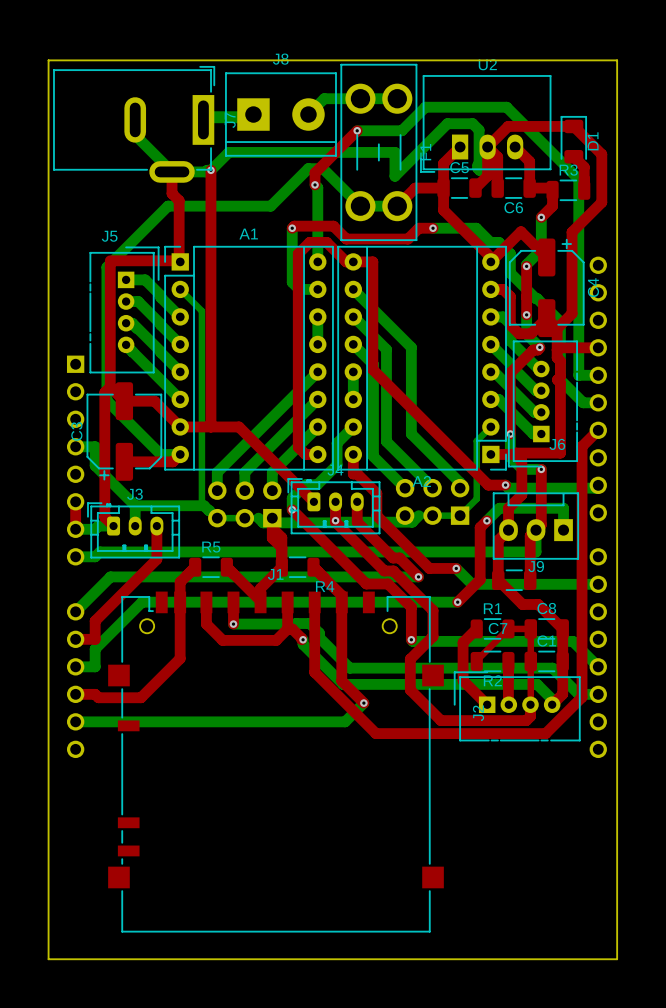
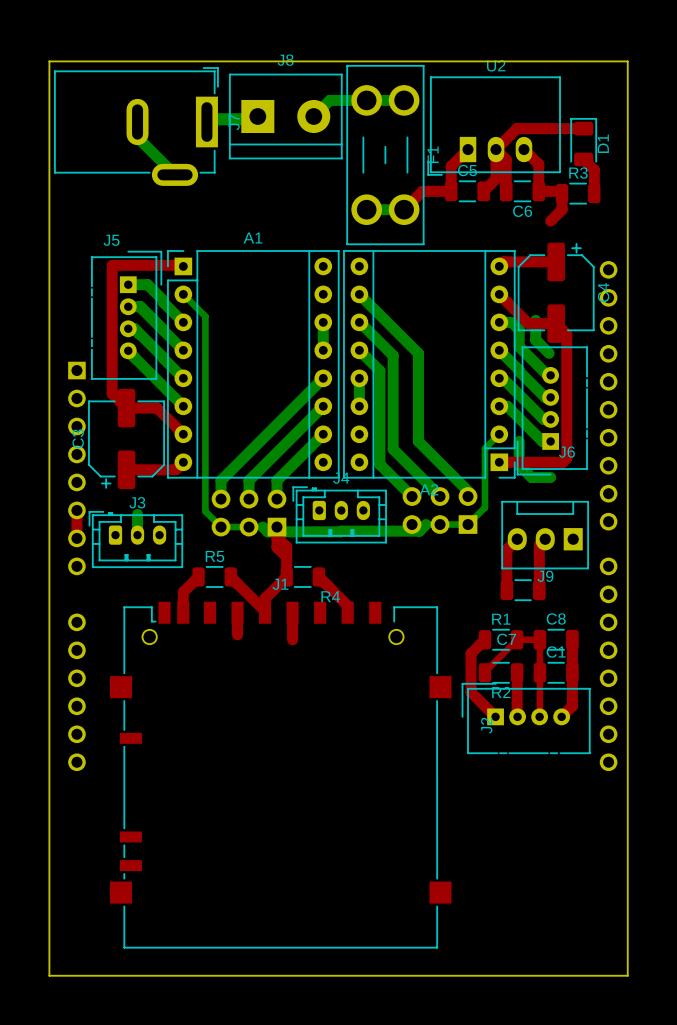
top track: (573, 126) (601, 154) (601, 202) (572, 232) (572, 313) (557, 328) -> none
bottom track: (357, 130) (401, 130) (425, 107) (506, 107) (578, 179) (578, 375) (598, 375) -> none
top track: (357, 130) (315, 172) (315, 184) -> none
via: (357, 130) -> none
bottom track: (487, 147) (487, 170) (479, 170) (477, 168) (479, 130) (472, 123) (447, 123) (394, 176) (394, 152) (228, 152) (210, 170) (172, 171) -> none
top track: (210, 170) (210, 426) -> none
via: (210, 170) -> none
top track: (172, 171) (172, 193) (179, 200) (179, 260) -> none
bottom track: (315, 184) (317, 187) (317, 261) -> none
via: (315, 184) -> none
top track: (443, 188) (443, 210) (493, 259) -> none
bottom track: (360, 206) (323, 168) (308, 168) (270, 206) (168, 206) (106, 267) (106, 400) (160, 454) (180, 454) -> none
bottom track: (541, 217) (541, 249) (526, 266) -> none
via: (541, 217) -> none
bottom track: (292, 228) (292, 282) (299, 289) (317, 289) -> none
top track: (292, 228) (294, 226) (333, 226) (346, 239) (408, 239) (418, 228) (433, 228) -> none
via: (292, 228) -> none
bottom track: (433, 228) (476, 228) (490, 242) (498, 242) (510, 253) (510, 273) (560, 321) (560, 379) (583, 402) (598, 402) -> none
via: (433, 228) -> none
top track: (495, 257) (521, 231) (546, 257) -> (503, 261) (556, 261)
via: (526, 266) -> none
top track: (490, 289) (503, 289) (510, 296) (510, 325) (519, 333) (531, 333) (546, 318) -> (499, 294) (528, 323) (556, 323)
via: (526, 314) -> none
top track: (539, 347) (533, 350) (510, 372) (510, 434) -> none
via: (539, 347) -> none
top track: (598, 347) (559, 347) (557, 349) -> none
top track: (557, 357) (560, 361) (560, 376) (557, 379) (560, 382) (560, 453) (514, 454) (521, 461) (521, 494) (508, 508) (508, 530) -> (566, 364) (566, 458) (562, 462) (523, 462)
top track: (110, 387) (104, 392) (104, 517) (113, 526) -> none
top track: (180, 426) (239, 426) (313, 501) -> none
bottom track: (353, 426) (337, 443) (337, 464) (317, 484) (305, 484) (292, 498) (292, 509) -> none
top track: (598, 430) (582, 446) (582, 697) (545, 733) (375, 733) (314, 672) (314, 602) -> none
via: (510, 434) -> none
bottom track: (75, 446) (95, 446) (95, 465) (135, 505) (204, 505) (209, 510) -> none
top track: (317, 454) (305, 454) (298, 447) (298, 253) (309, 242) (326, 242) (346, 261) (372, 261) (372, 369) (488, 485) (505, 485) -> none
top track: (353, 454) (353, 473) (357, 473) (376, 493) (376, 515) (429, 568) (456, 568) -> none
top track: (541, 469) (541, 524) (536, 530) -> none
via: (541, 469) -> none
bottom track: (505, 485) (508, 488) (595, 488) (598, 485) -> none
via: (505, 485) -> none
top track: (335, 501) (335, 522) (384, 570) (393, 570) (433, 610) (433, 636) (410, 659) (410, 689) (440, 720) (526, 720) (530, 716) (530, 704) -> none
top track: (357, 501) (357, 522) (393, 557) (399, 557) (418, 576) -> none
top track: (292, 509) (366, 583) (388, 583) (411, 607) (411, 639) -> none
via: (292, 509) -> none
via: (335, 520) -> none
bottom track: (486, 520) (499, 508) (563, 508) (563, 530) -> none
top track: (486, 520) (480, 527) (480, 579) (457, 602) -> none
via: (486, 520) -> none
bottom track: (113, 526) (98, 526) (95, 529) (75, 529) -> none
top track: (156, 526) (156, 559) (95, 621) (95, 639) (75, 639) -> none
bottom track: (536, 530) (536, 551) (100, 551) (95, 556) (75, 556) -> none
bottom track: (456, 568) (472, 584) (598, 584) -> none
via: (456, 568) -> none
bottom track: (418, 576) (110, 576) (75, 611) -> none
via: (418, 576) -> none
top track: (498, 580) (522, 604) (538, 604) (562, 628) -> none
top track: (180, 602) (180, 658) (141, 697) (98, 697) (95, 694) (75, 694) -> none
top track: (206, 602) (206, 624) (222, 640) (276, 640) (287, 628) (292, 628) (301, 639) -> none
top track: (341, 602) (341, 681) (363, 703) -> none
bottom track: (457, 602) (142, 602) (95, 649) (95, 666) (75, 666) -> none
via: (457, 602) -> none
bottom track: (233, 624) (309, 623) (319, 633) (319, 637) (349, 668) (552, 668) (578, 694) (598, 694) -> none
via: (233, 624) -> none
bottom track: (303, 639) (303, 644) (343, 684) (537, 684) (552, 699) (552, 704) -> none
via: (303, 639) -> none
bottom track: (411, 639) (413, 641) (572, 641) (598, 666) -> none
via: (411, 639) -> none
bottom track: (363, 703) (345, 721) (75, 721) -> none
via: (363, 703) -> none

